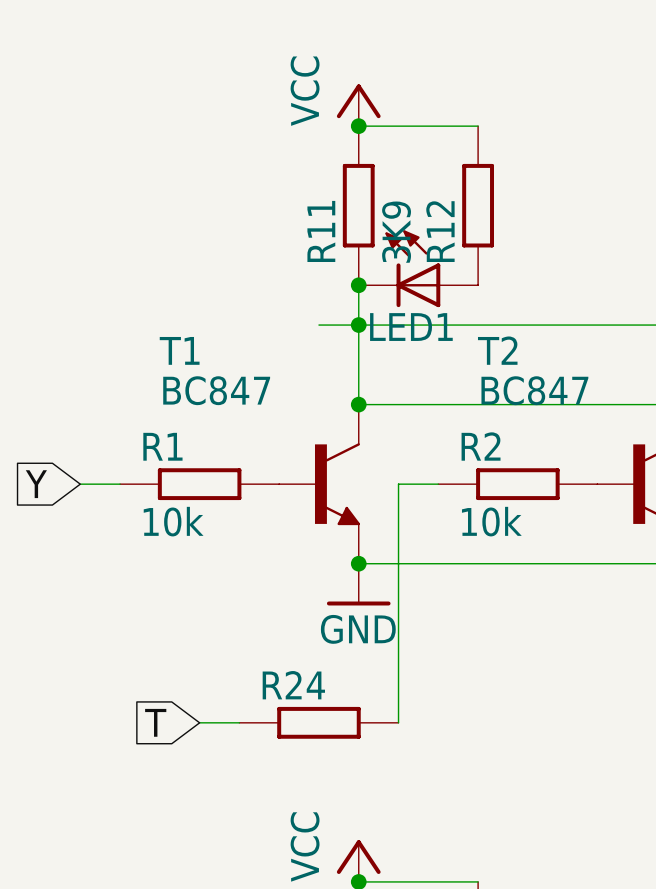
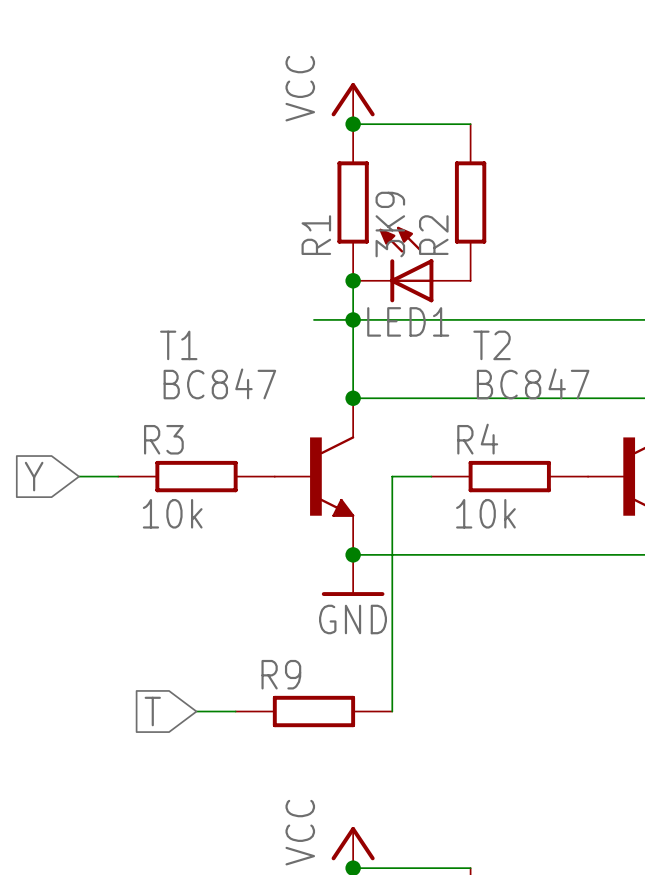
R11 name: R11 (321, 231) -> R1 (316, 235)
R12 name: R12 (440, 231) -> R2 (433, 235)
R1 name: R1 (162, 446) -> R3 (163, 439)
R2 name: R2 (481, 446) -> R4 (477, 439)
R24 name: R24 (293, 685) -> R9 (281, 674)

